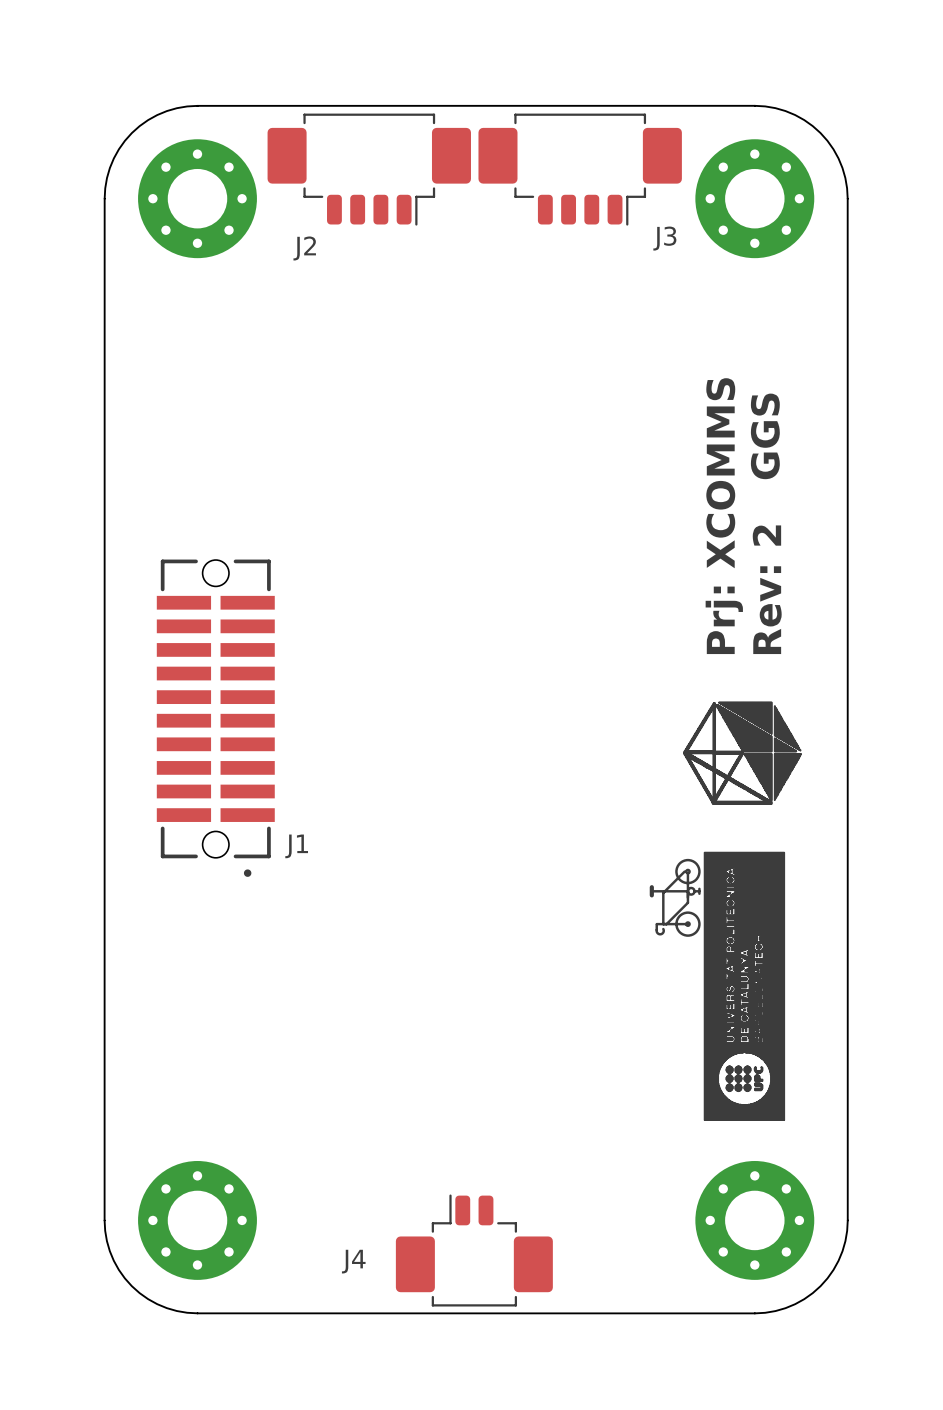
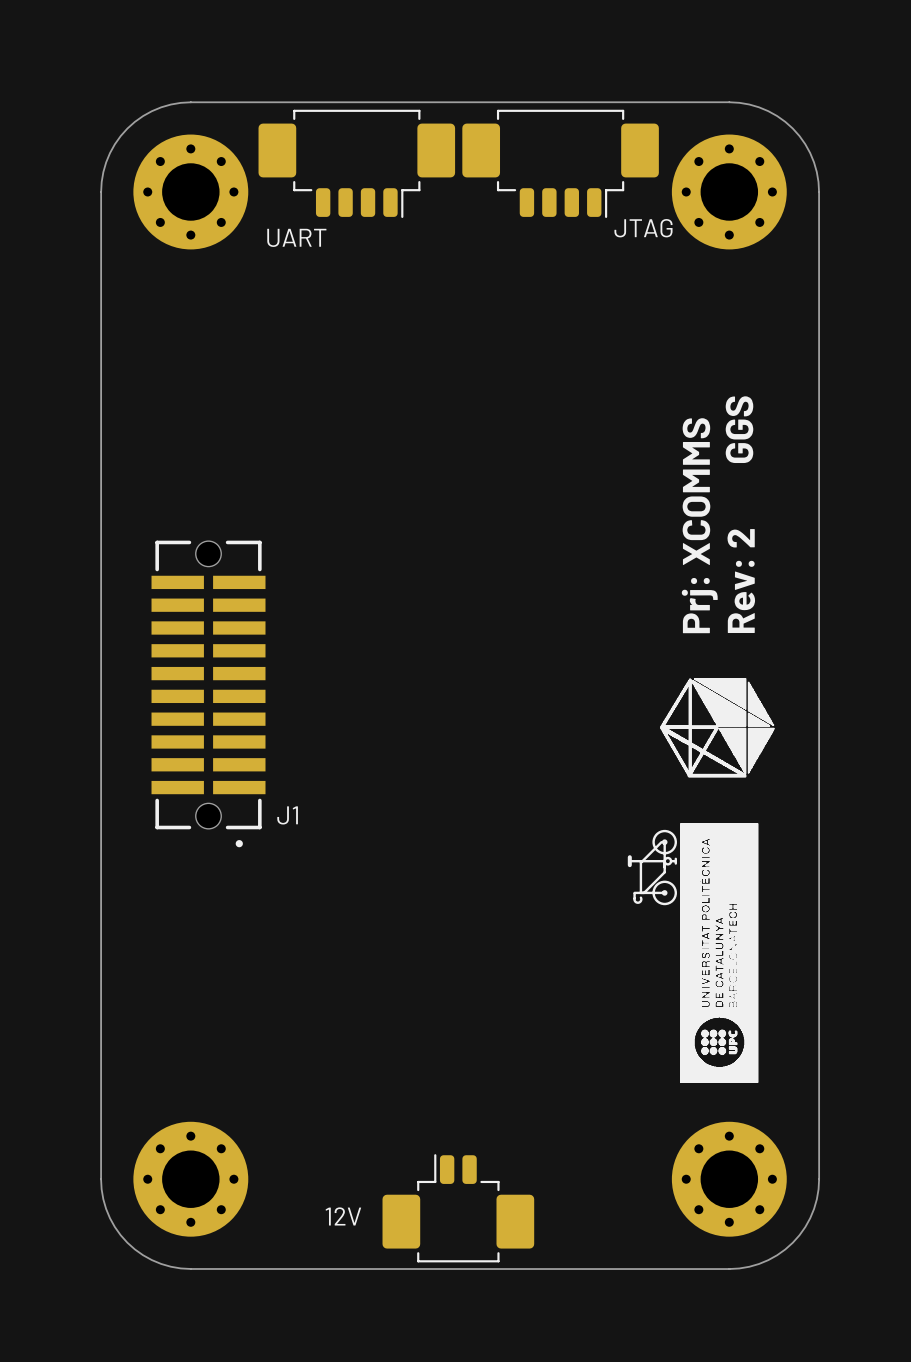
J3 name: J3 (664, 238) -> JTAG (643, 228)
J2 name: J2 (304, 248) -> UART (296, 237)
J4 name: J4 (353, 1261) -> 12V (343, 1216)

